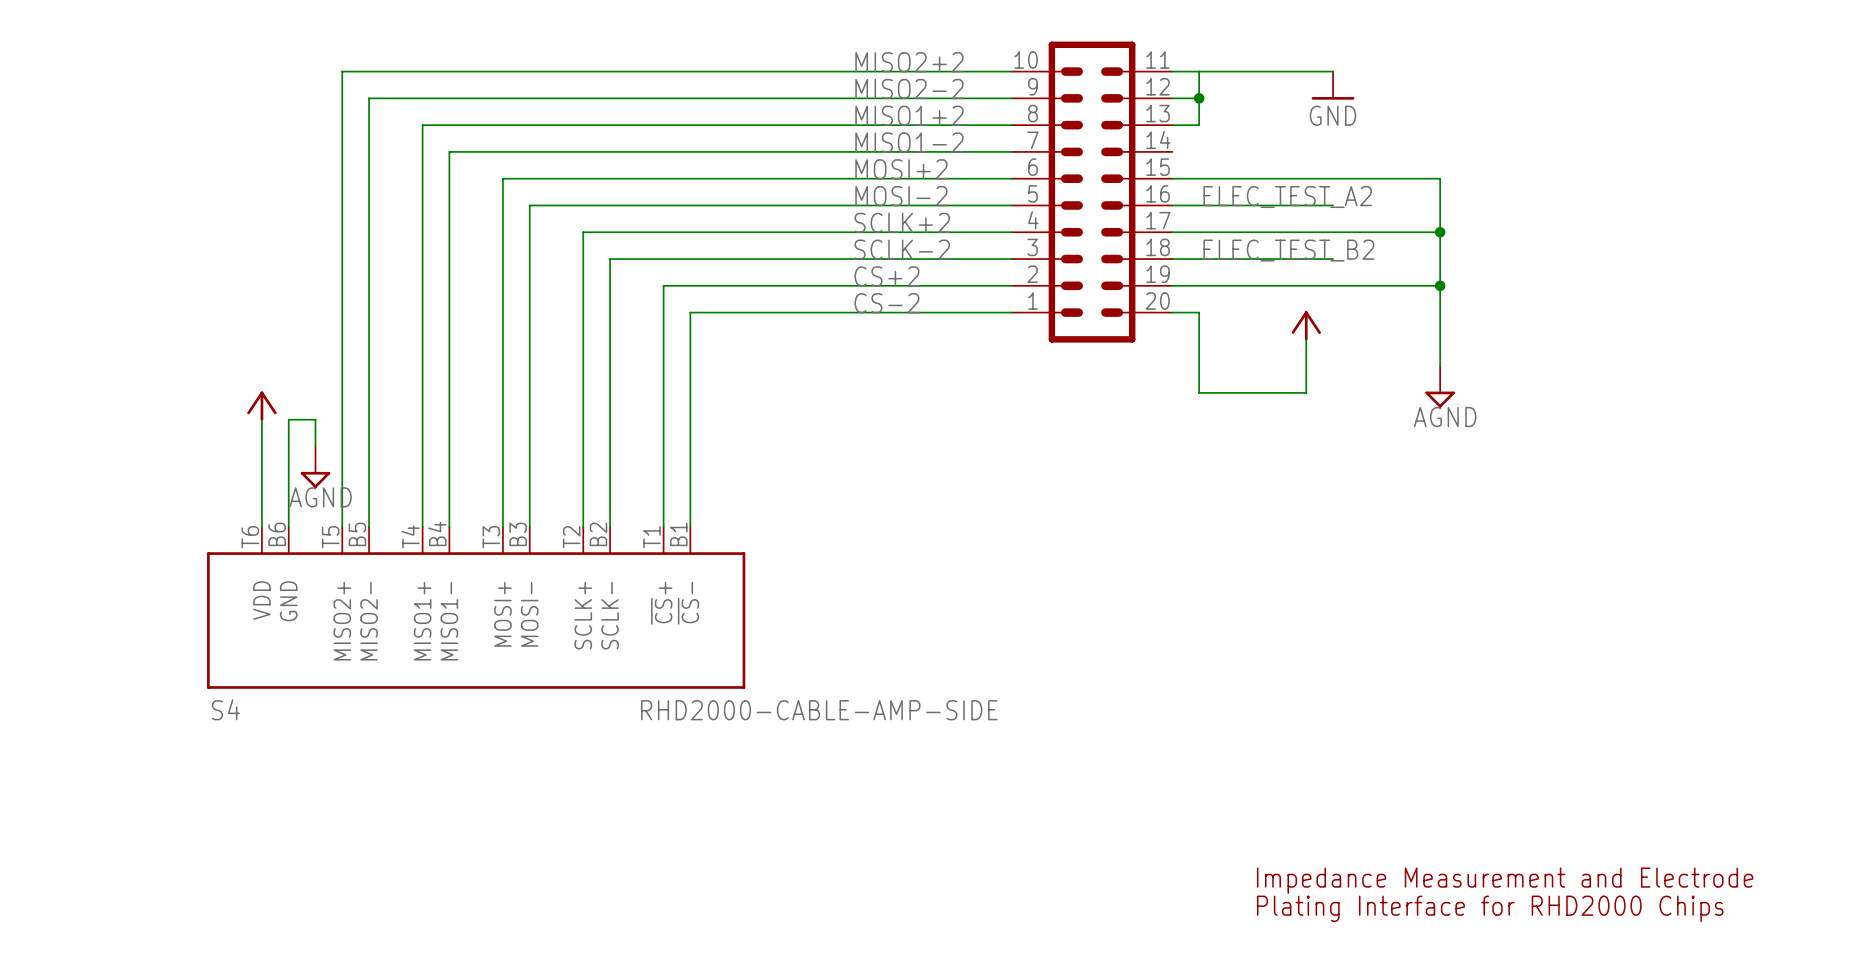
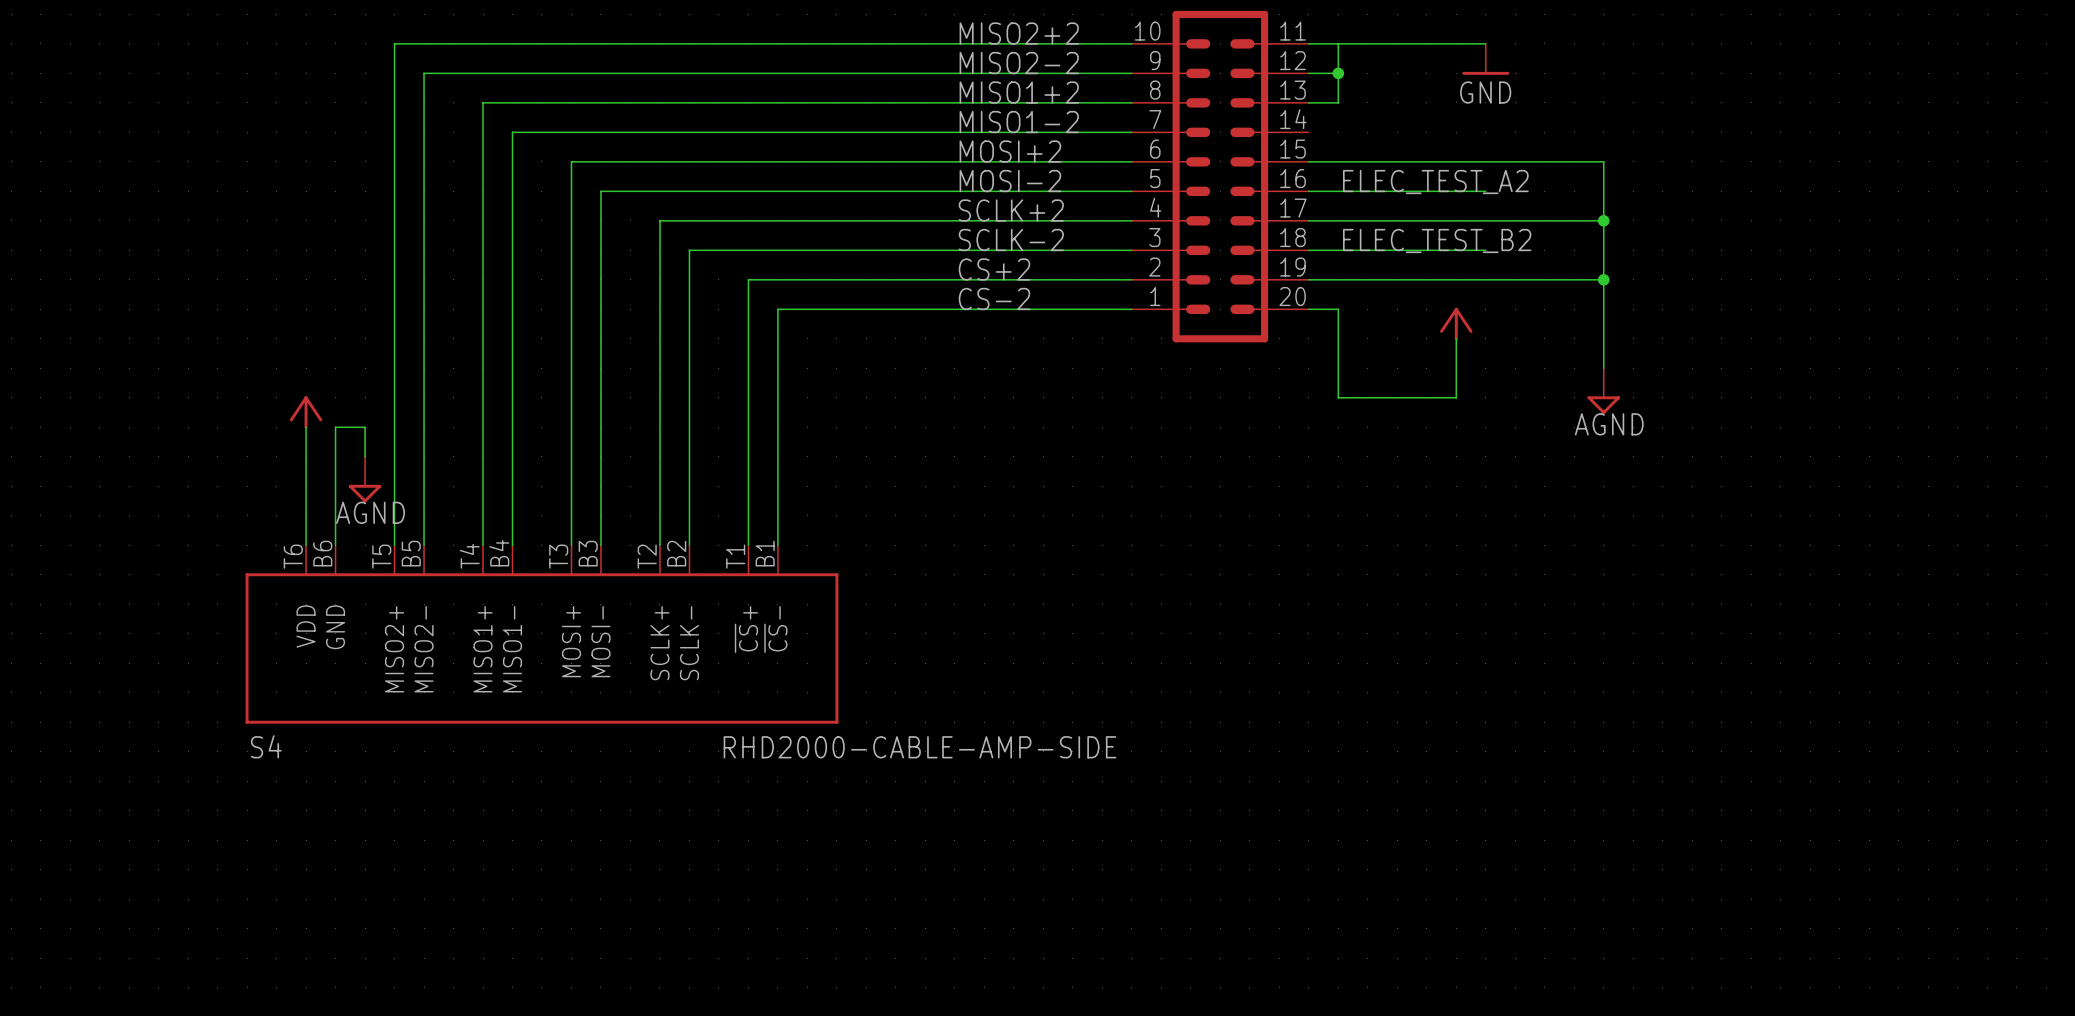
text: Impedance Measurement and Electrode (1505, 880) -> none
text: Plating Interface for RHD2000 Chips (1490, 908) -> none

